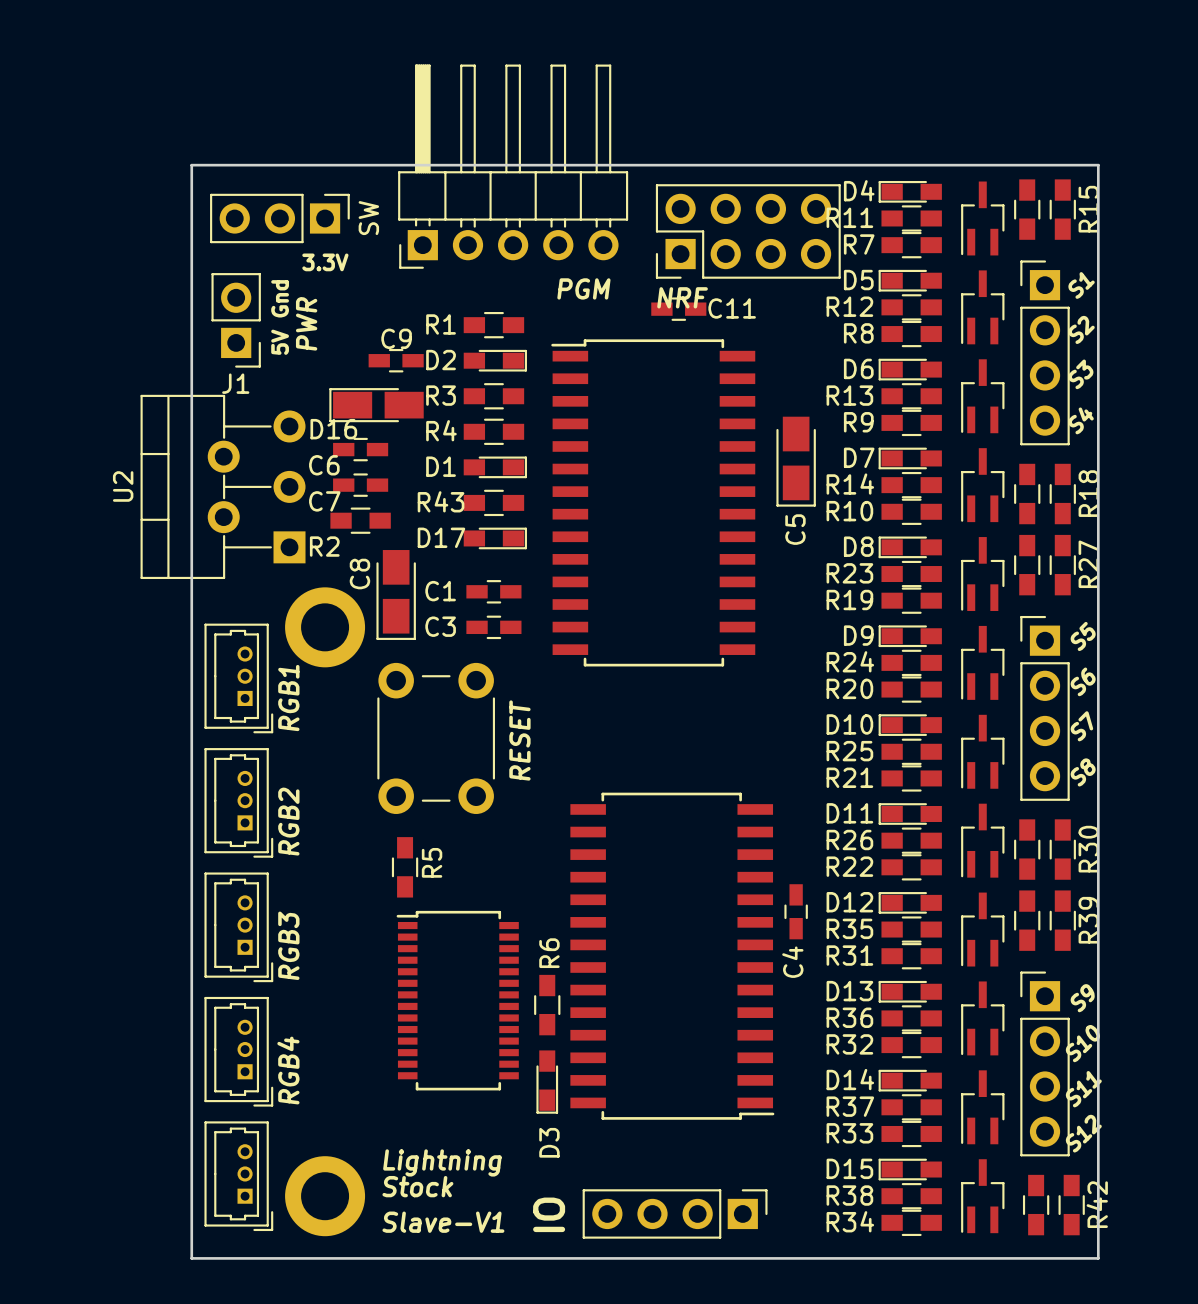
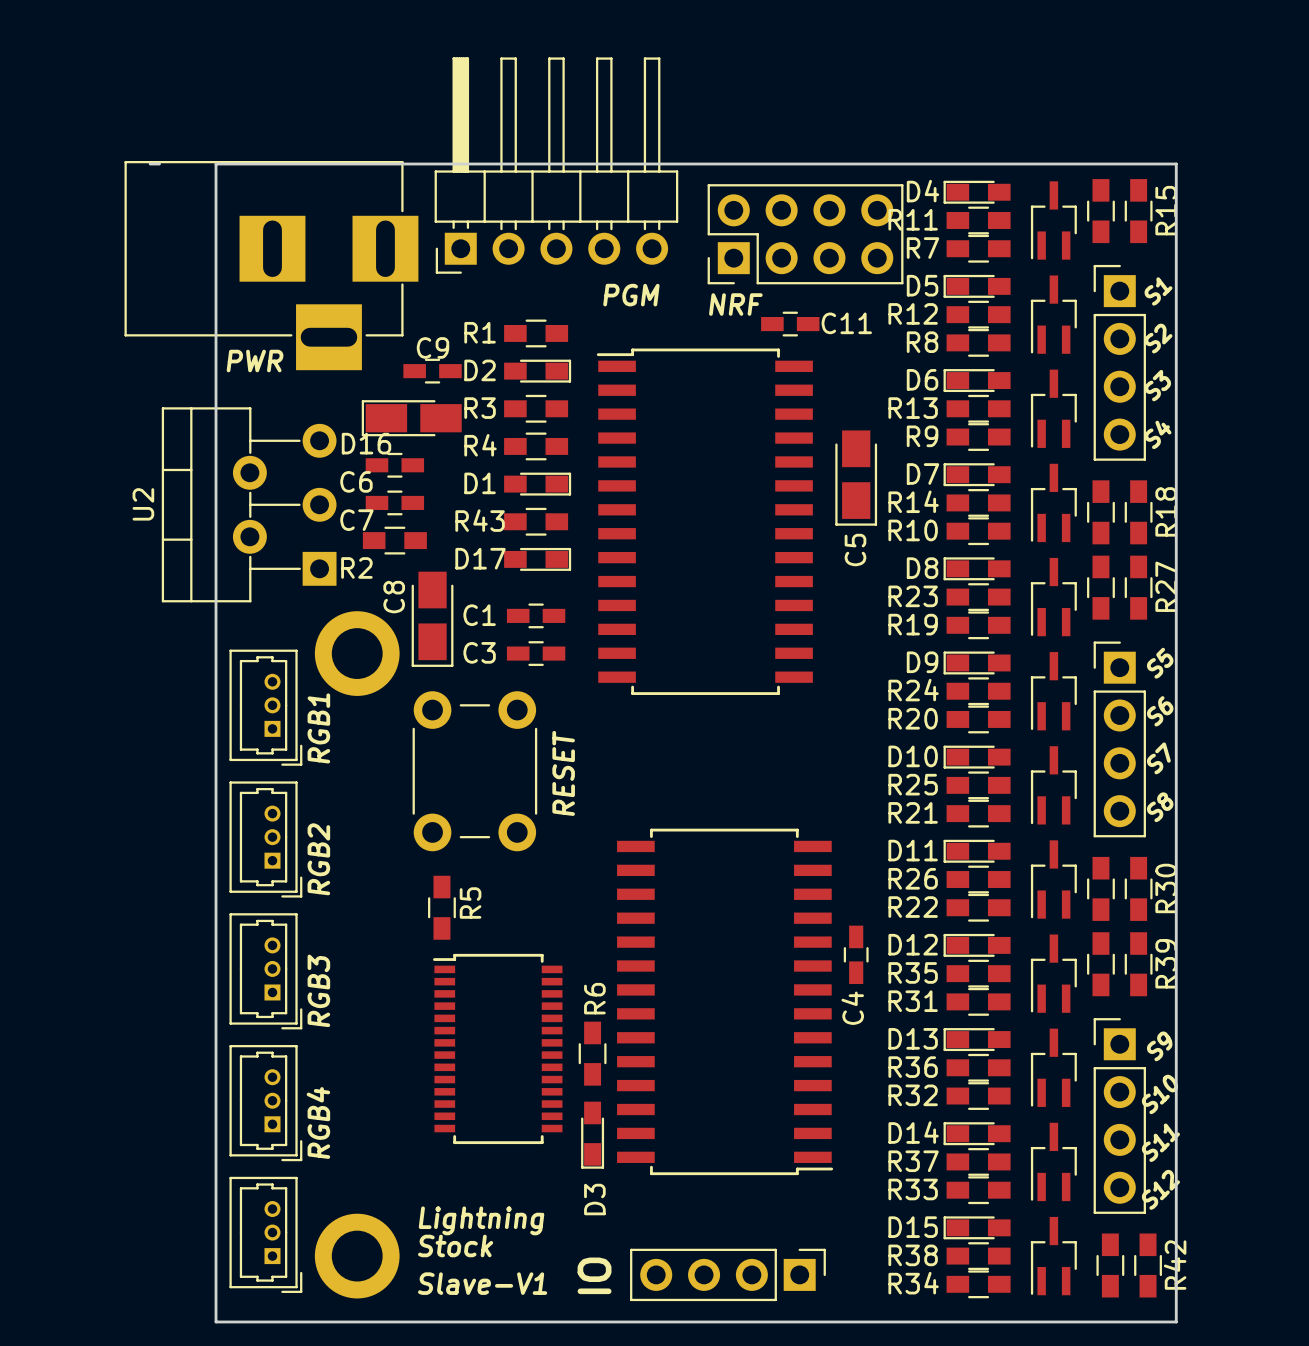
board edge: none -> (150, 164) (159, 164)
SW: (279, 218) -> none
part: none -> (271, 265)
text: 3.3V (325, 262) -> none
text: Gnd (280, 298) -> none
C11 position: (678, 309) -> (790, 324)
J1: (236, 320) -> none
text rotation: 0° (306, 323) -> 90° clockwise (255, 361)
text position: PWR (306, 323) -> PWR (255, 361)
text: 5V (280, 342) -> none

